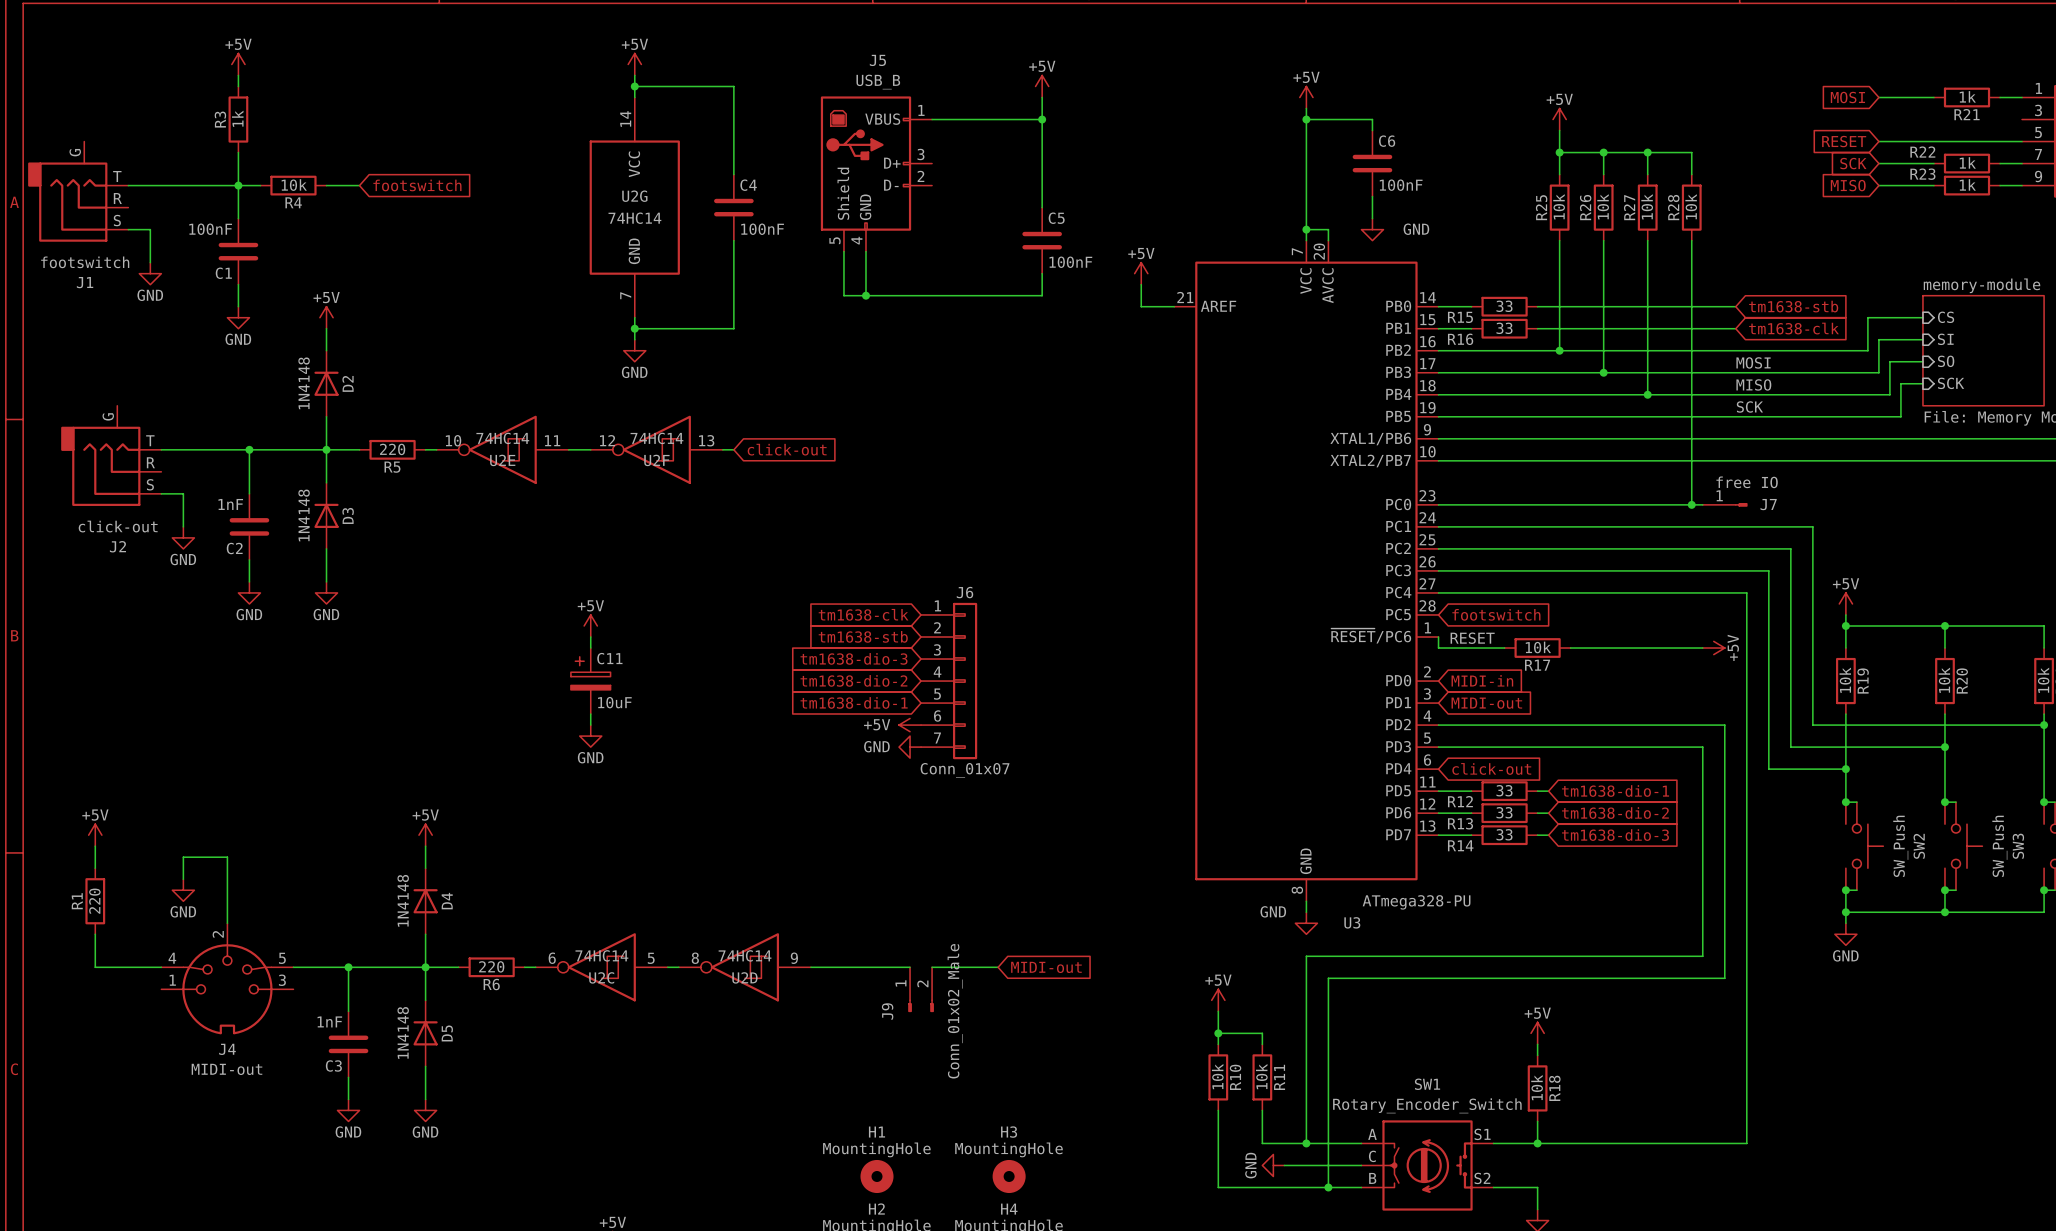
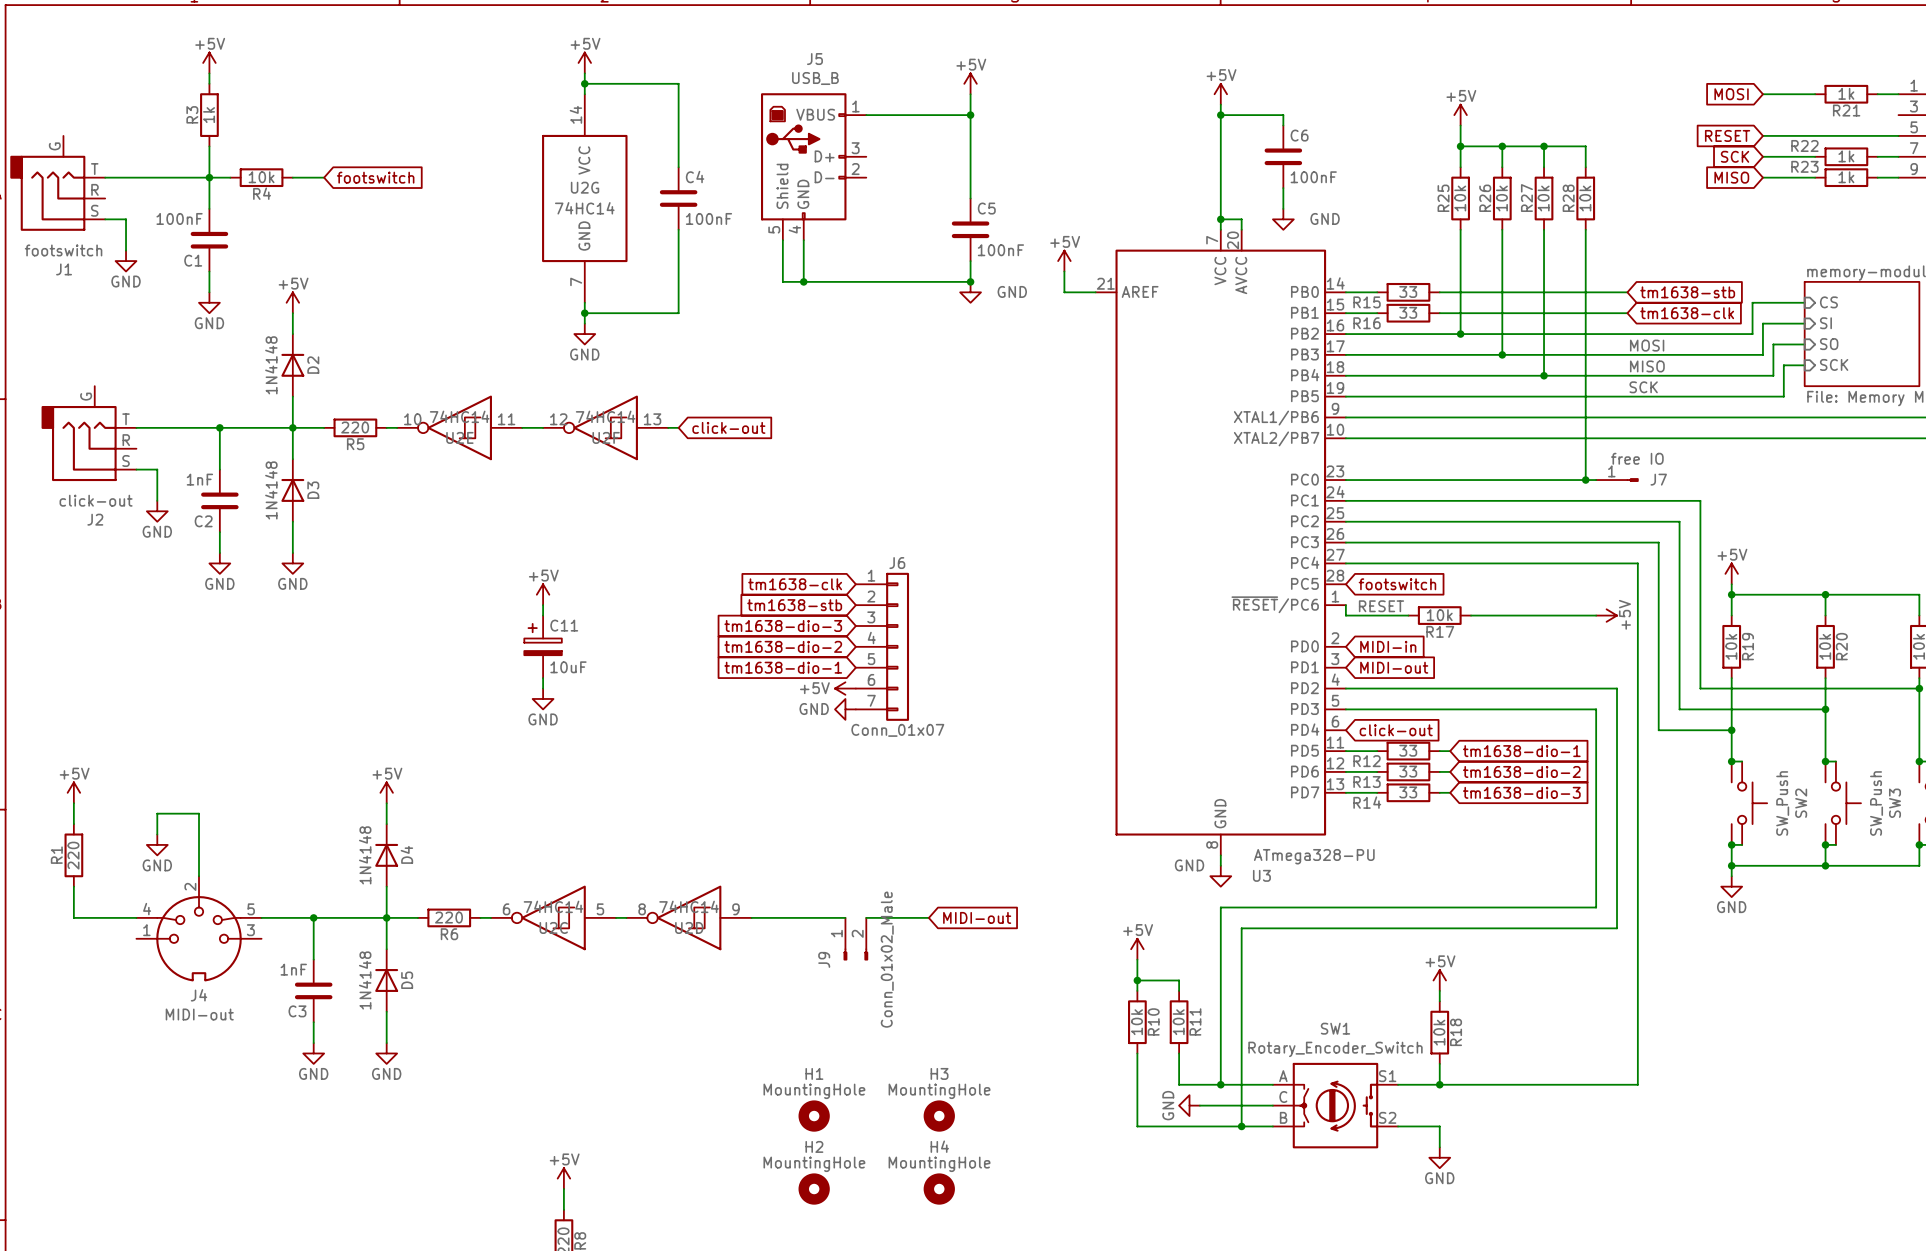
junction: none -> (970, 281)
power symbol: none -> GND (970, 292)

